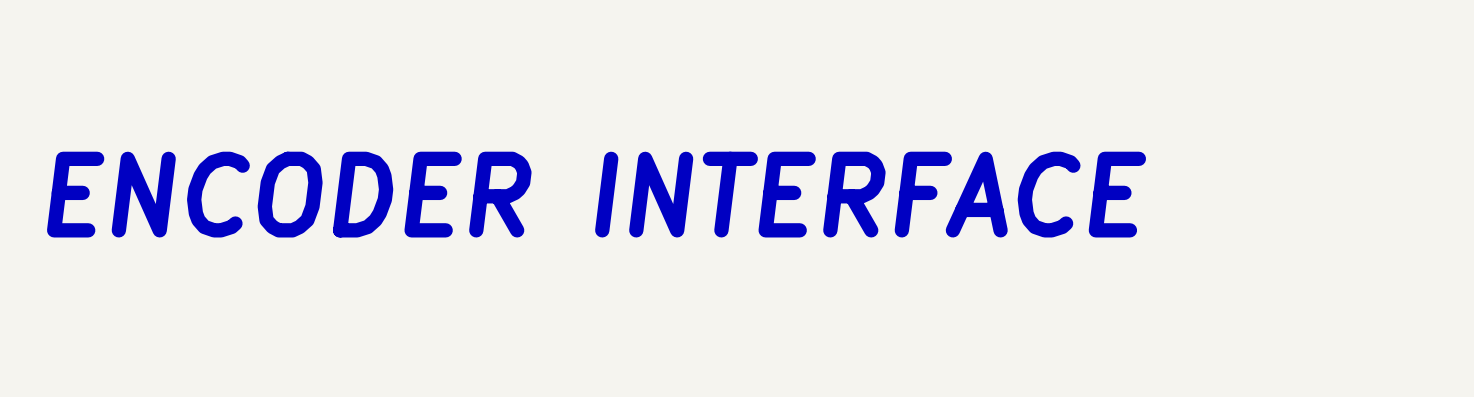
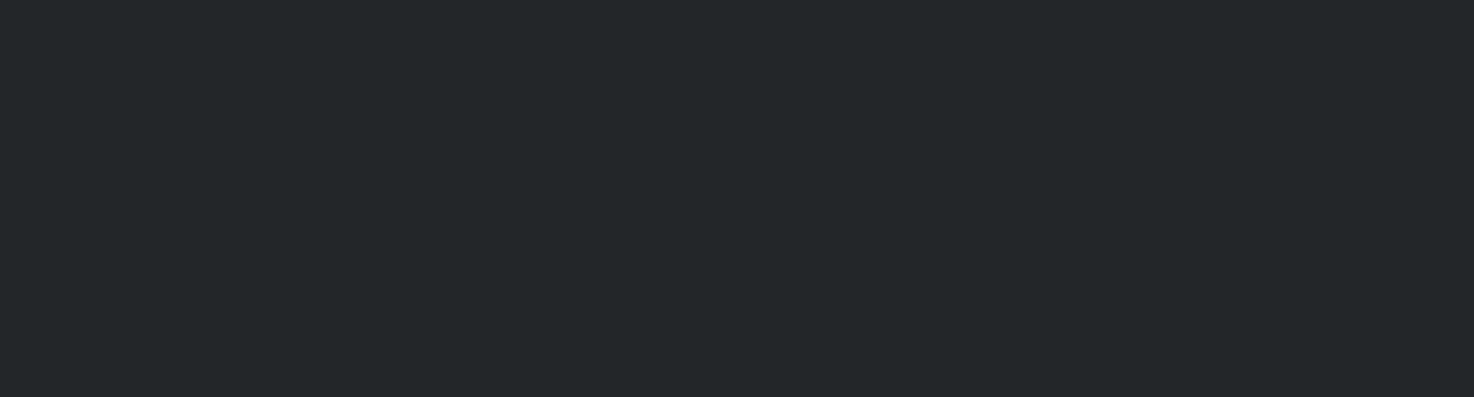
text: ENCODER INTERFACE (596, 194) -> none

